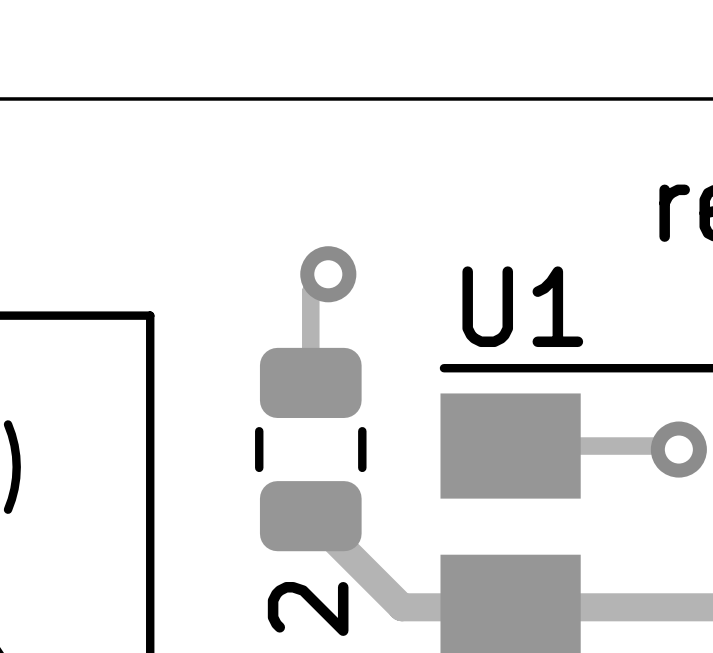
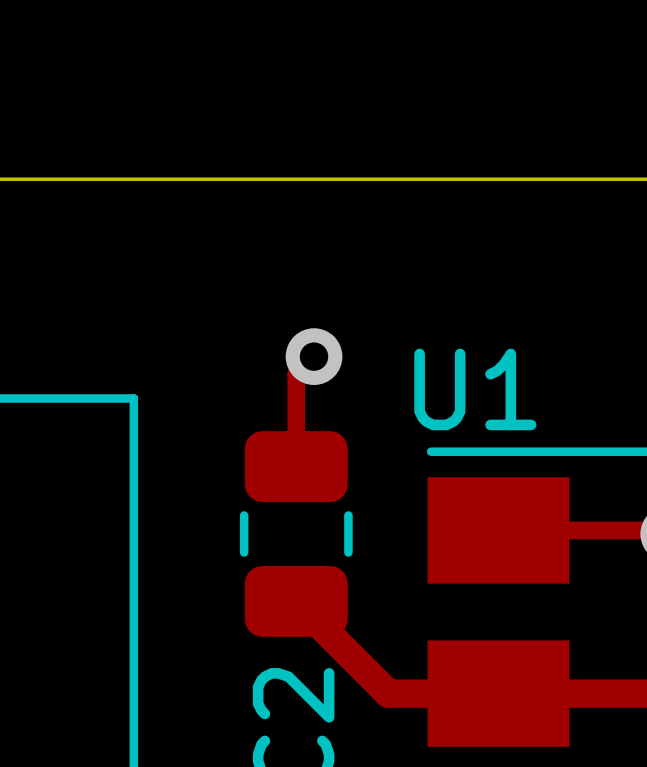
U1 name position: U1 (522, 306) -> U1 (475, 389)

